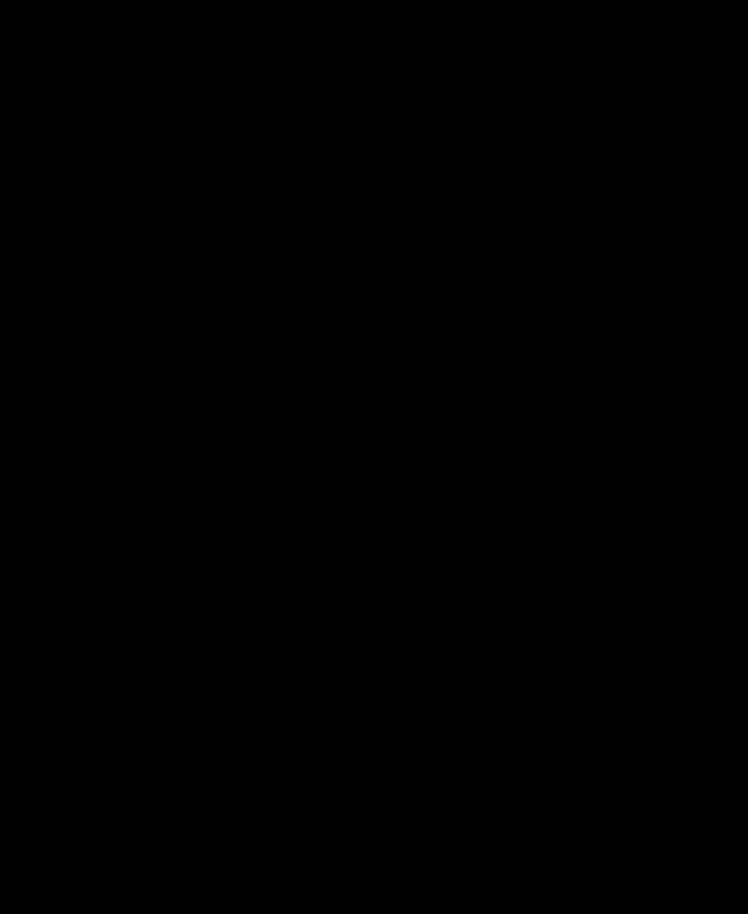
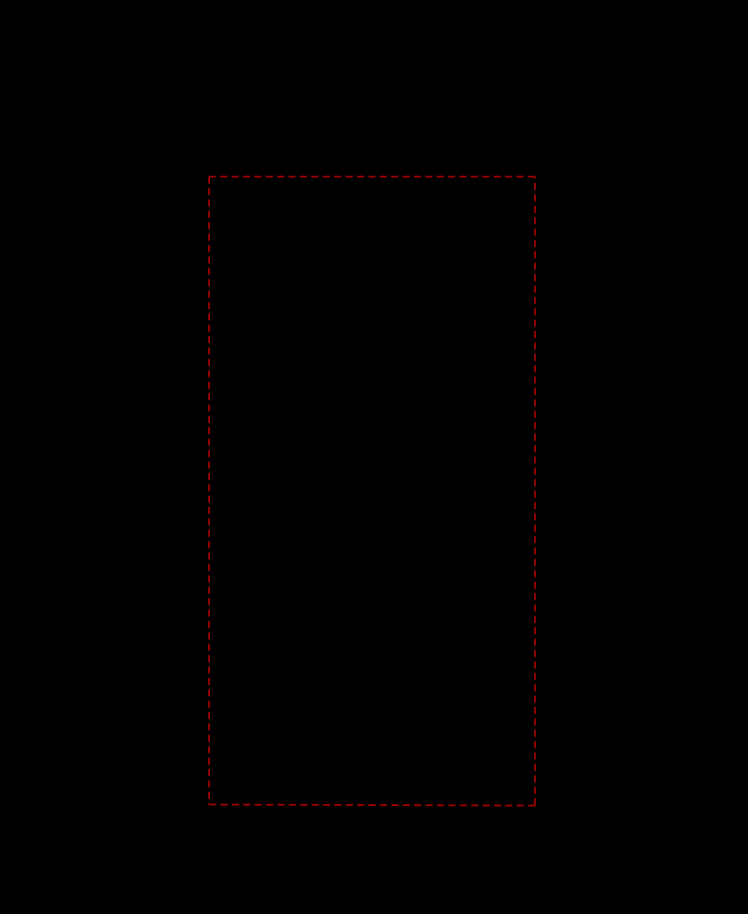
zone outline: none -> (534, 805) (534, 176) (209, 176) (209, 804) (534, 805)

